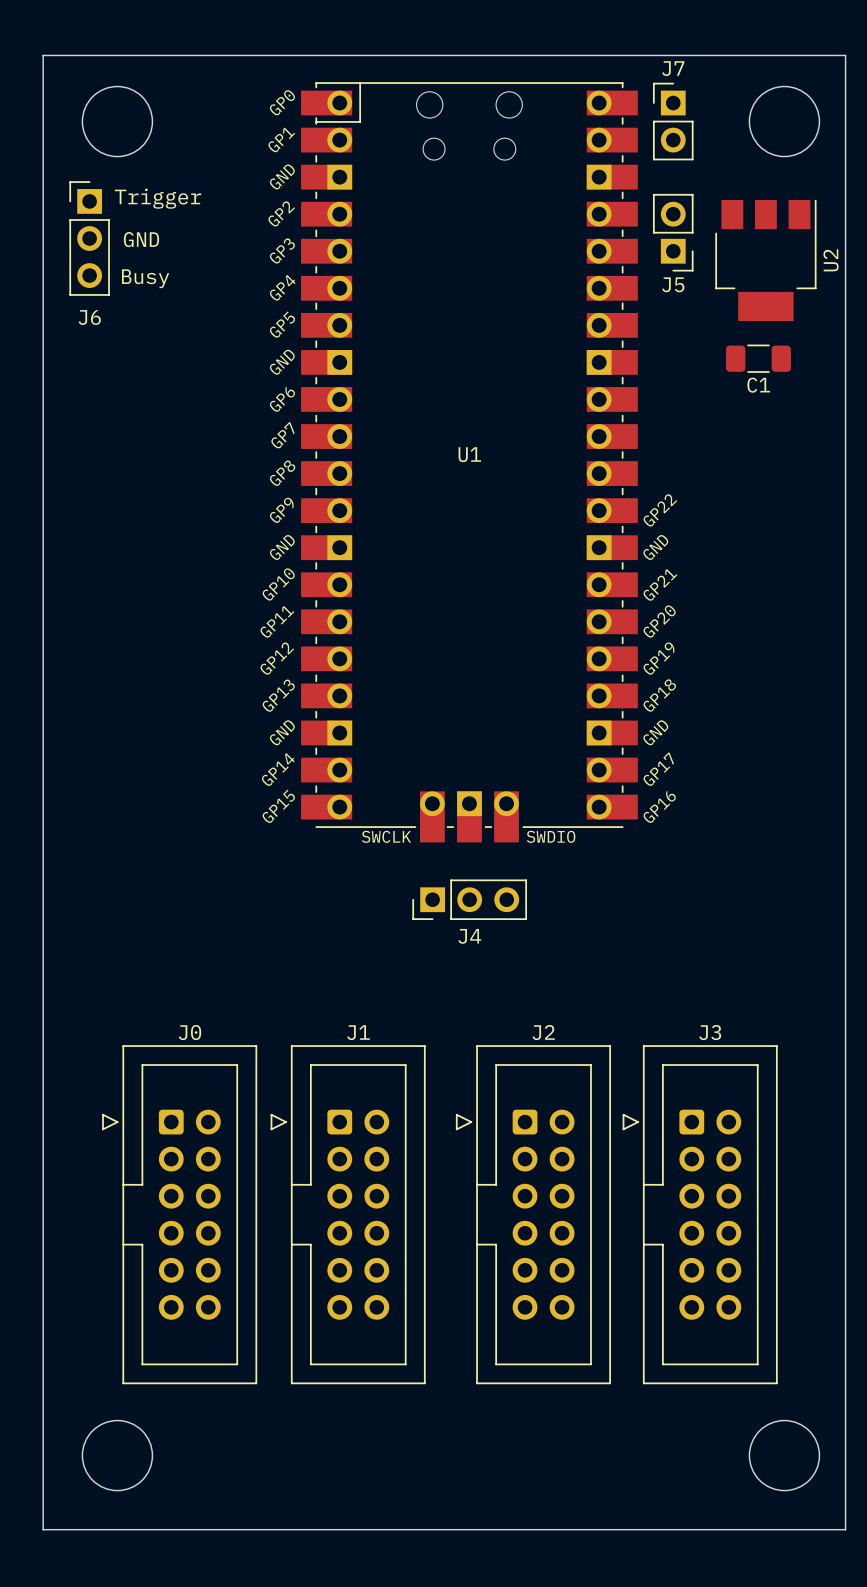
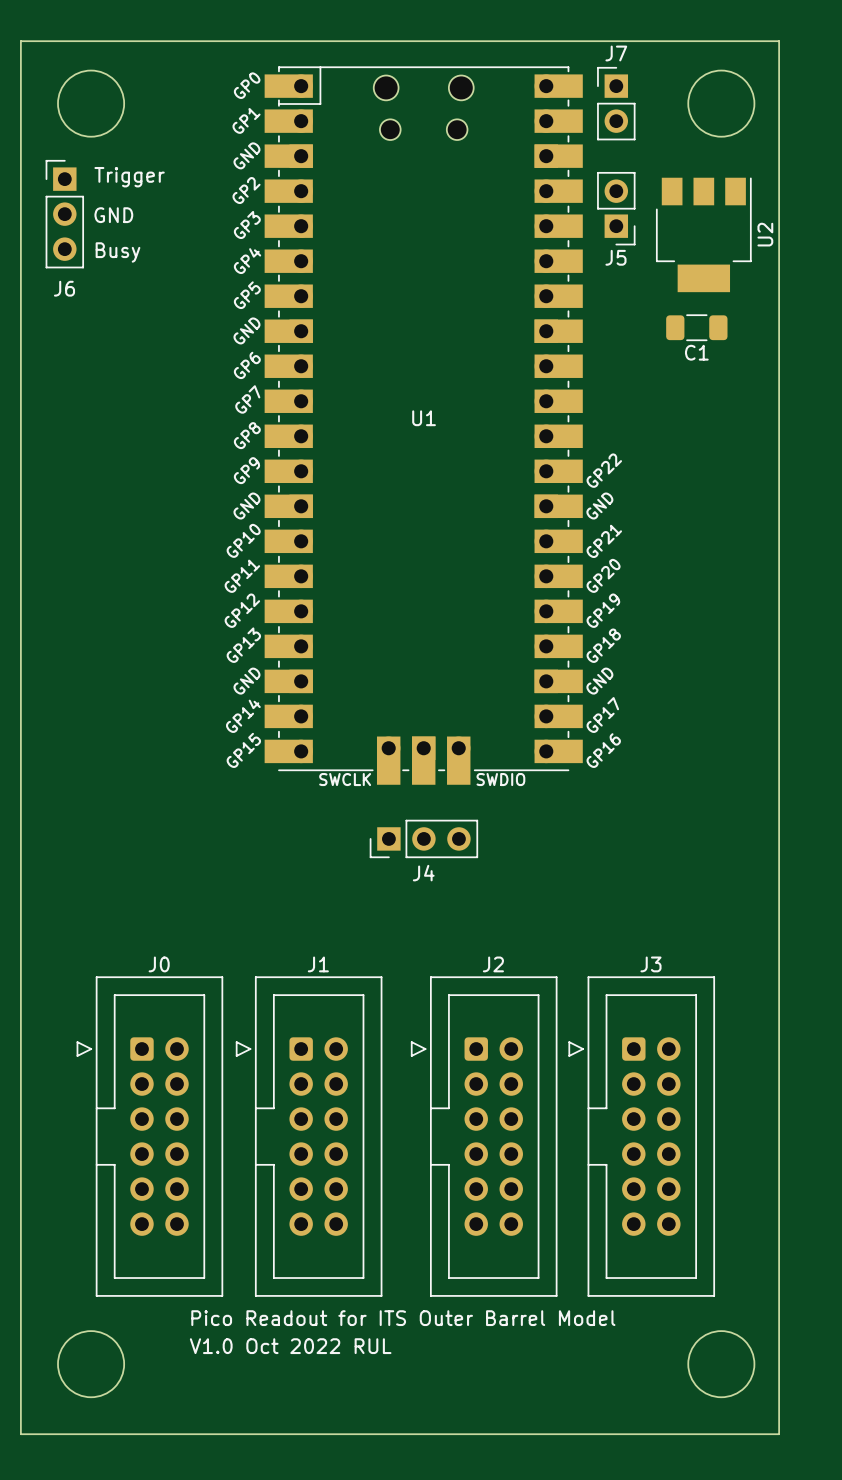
text: none -> Pico Readout for ITS Outer Barrel Model (403, 1318)
text: none -> V1.0 Oct 2022 RUL (290, 1346)

